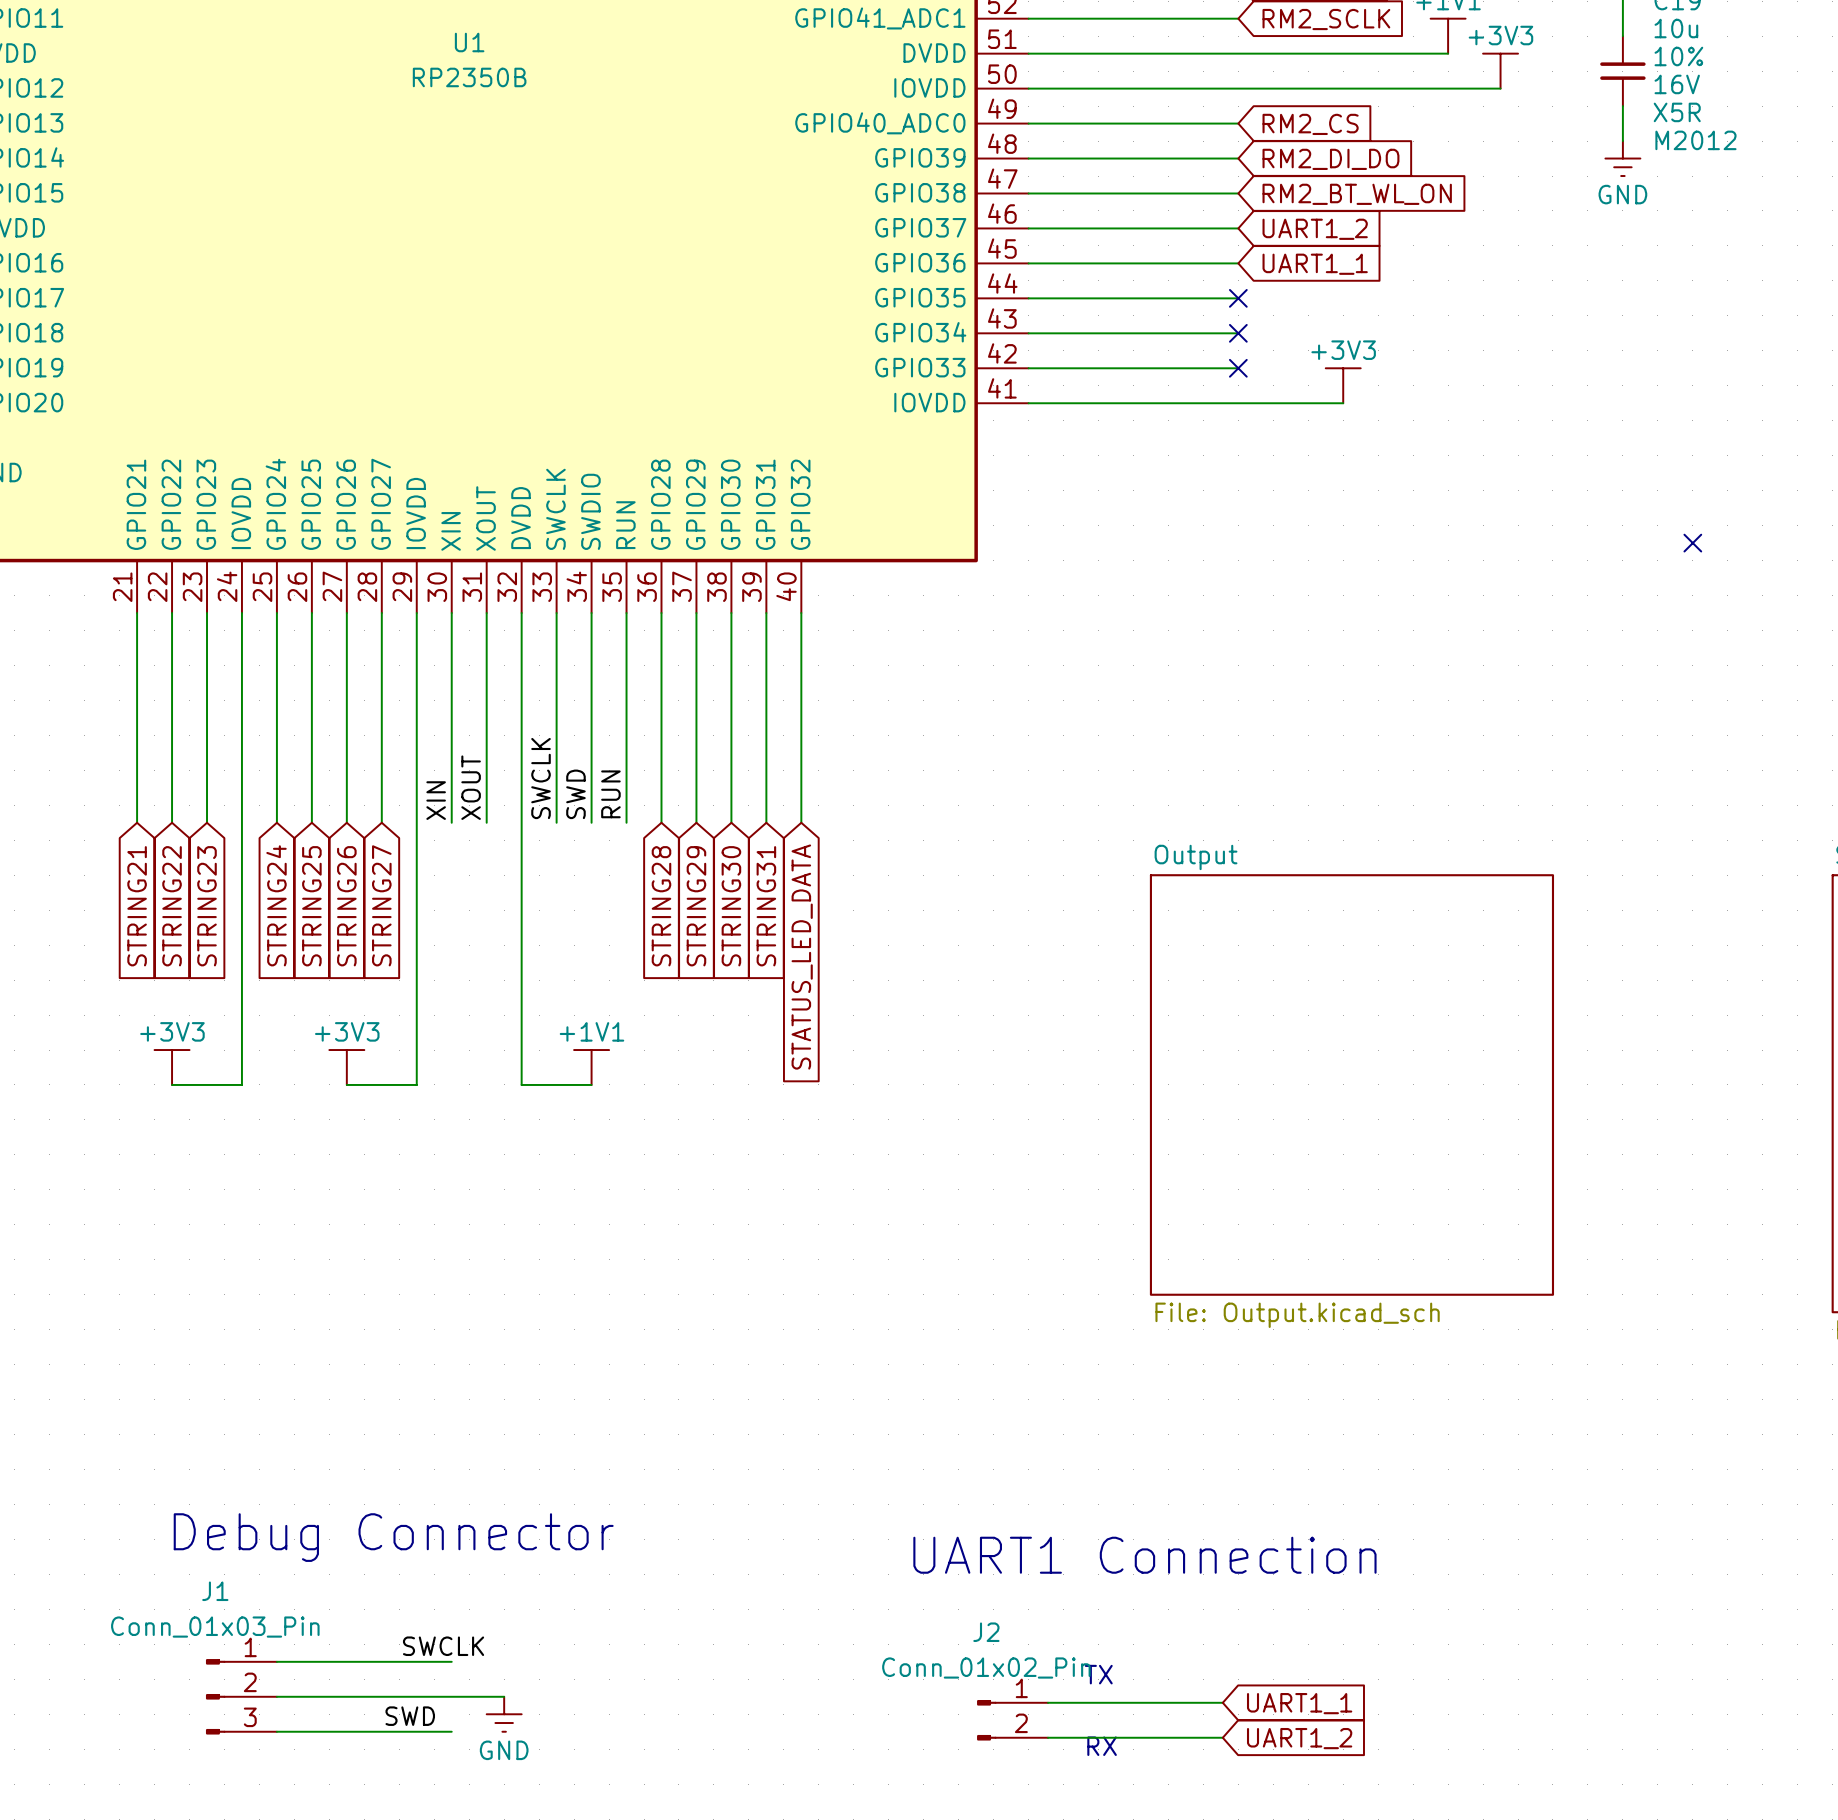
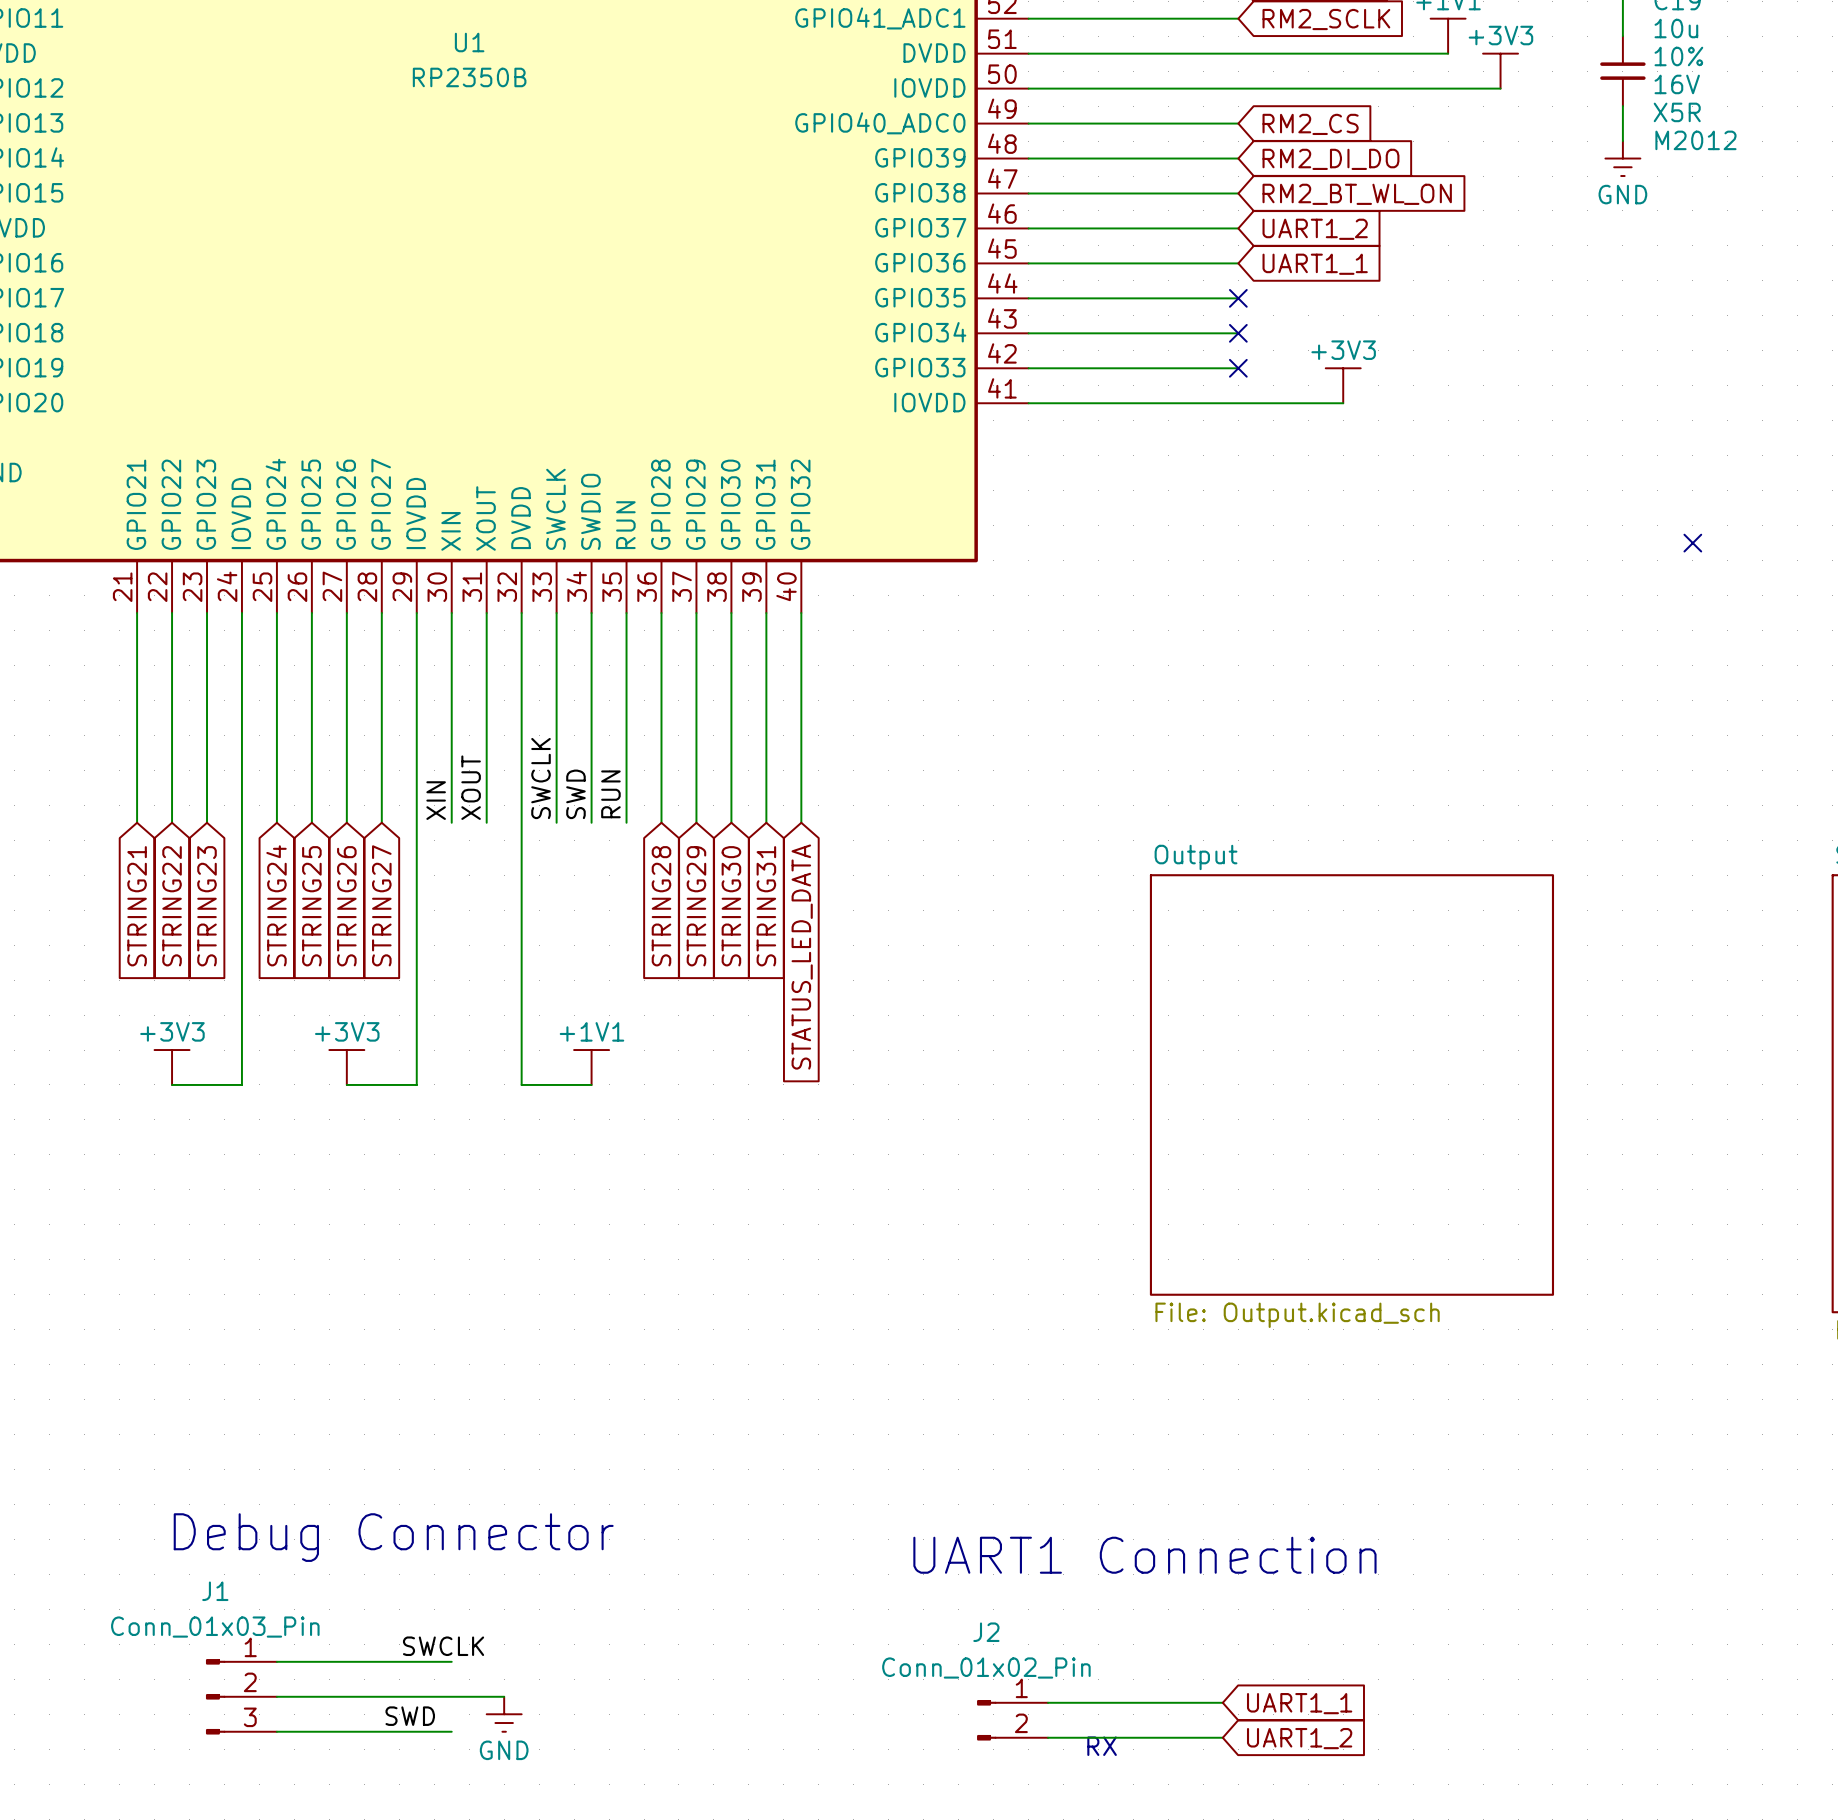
text: TX (1098, 1674) -> none

